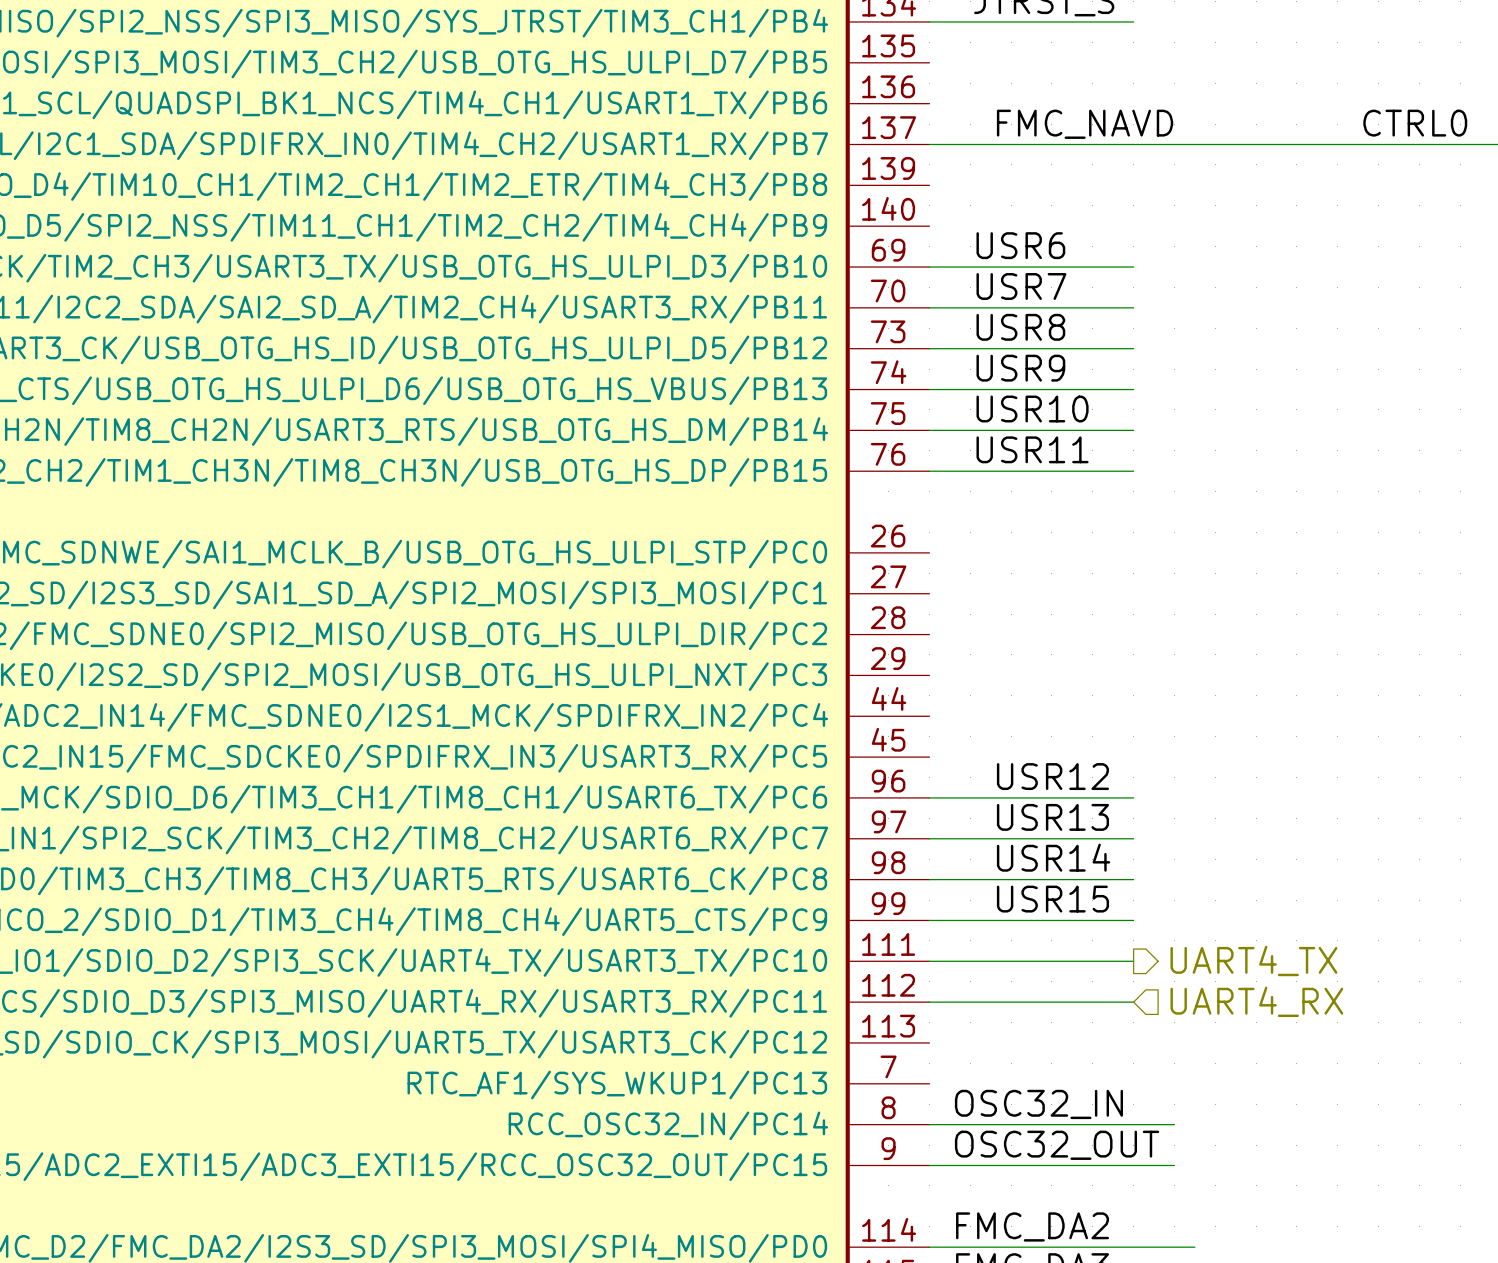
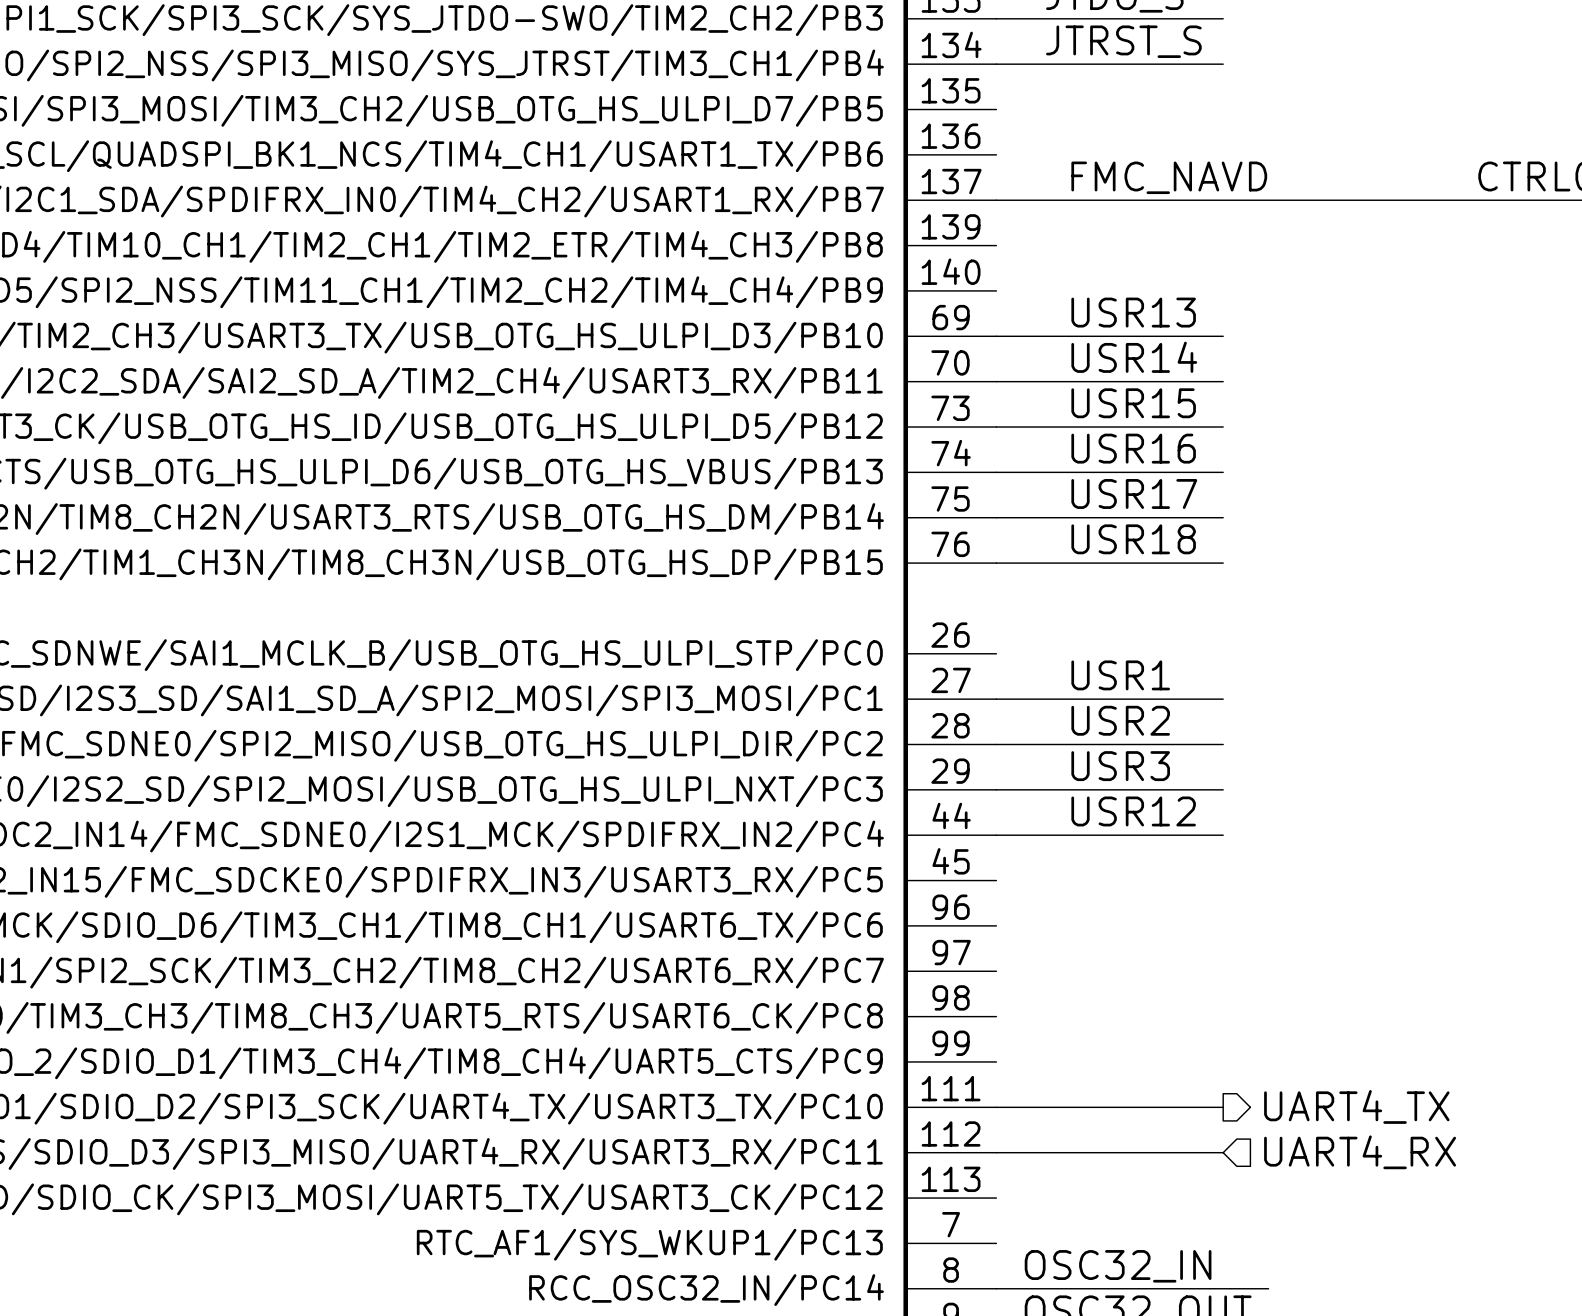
label: USR6 (1020, 245) -> USR13 (1133, 312)
label: USR7 (1021, 286) -> USR14 (1134, 357)
label: USR8 (1020, 327) -> USR15 (1133, 403)
label: USR9 (1020, 368) -> USR16 (1133, 448)
label: USR10 (1032, 409) -> USR17 (1134, 493)
label: USR11 (1032, 449) -> USR18 (1133, 539)
label: none -> USR1 (1120, 675)
label: none -> USR2 (1120, 720)
label: none -> USR3 (1120, 766)
label position: USR12 (1052, 776) -> USR12 (1133, 811)
wire: (929, 797) (1133, 797) -> (996, 699) (1223, 699)
label: USR13 (1052, 817) -> none
wire: (929, 838) (1133, 838) -> (996, 744) (1223, 744)
label: USR14 (1053, 857) -> none
wire: (929, 879) (1133, 879) -> (996, 789) (1223, 789)
label: USR15 (1052, 899) -> none
wire: (929, 920) (1133, 920) -> (996, 835) (1223, 835)

